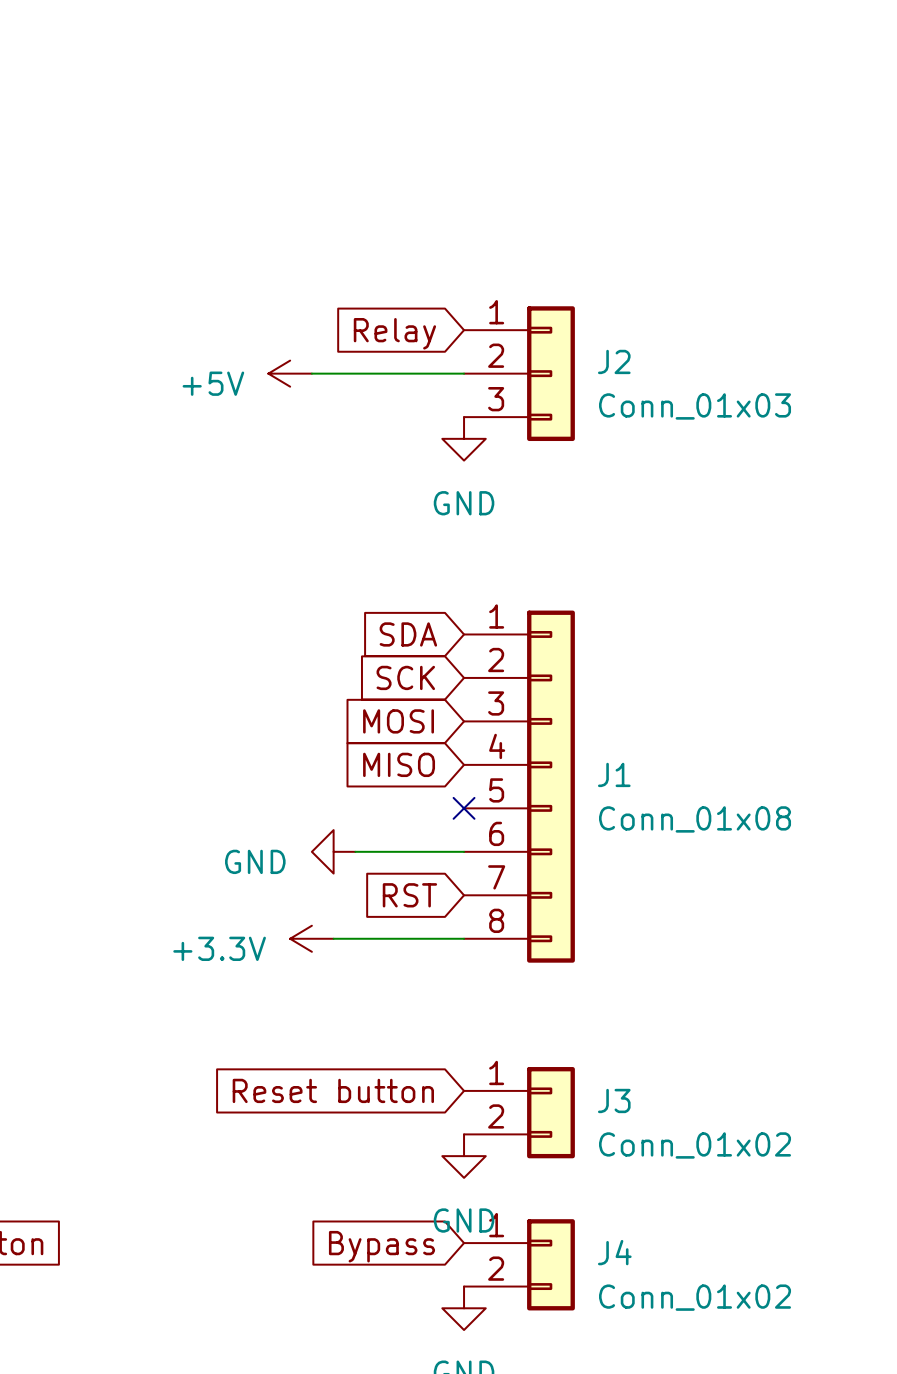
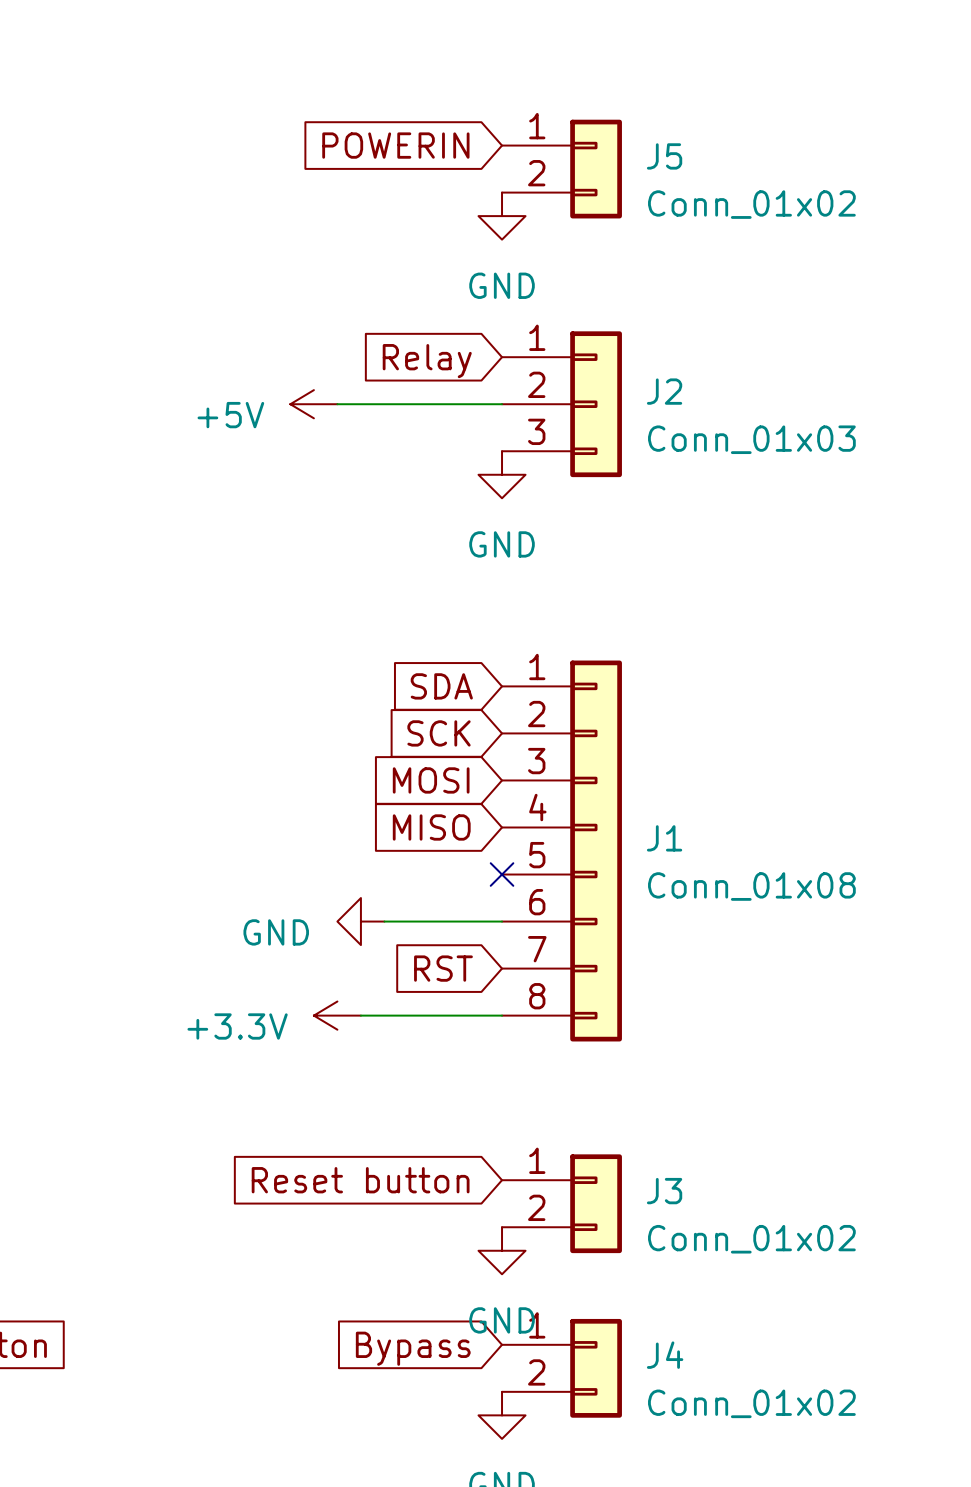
global label: none -> POWERIN (395, 145)
J5: none -> Conn_01x02 (561, 169)
power symbol: none -> GND (502, 216)

